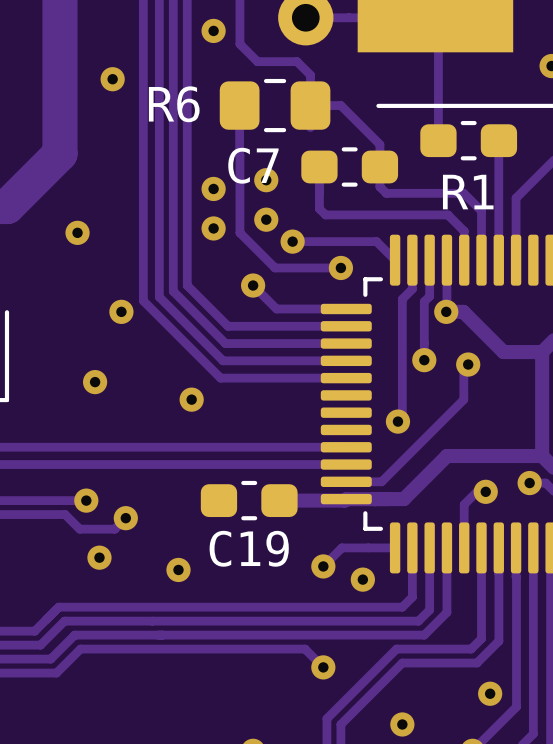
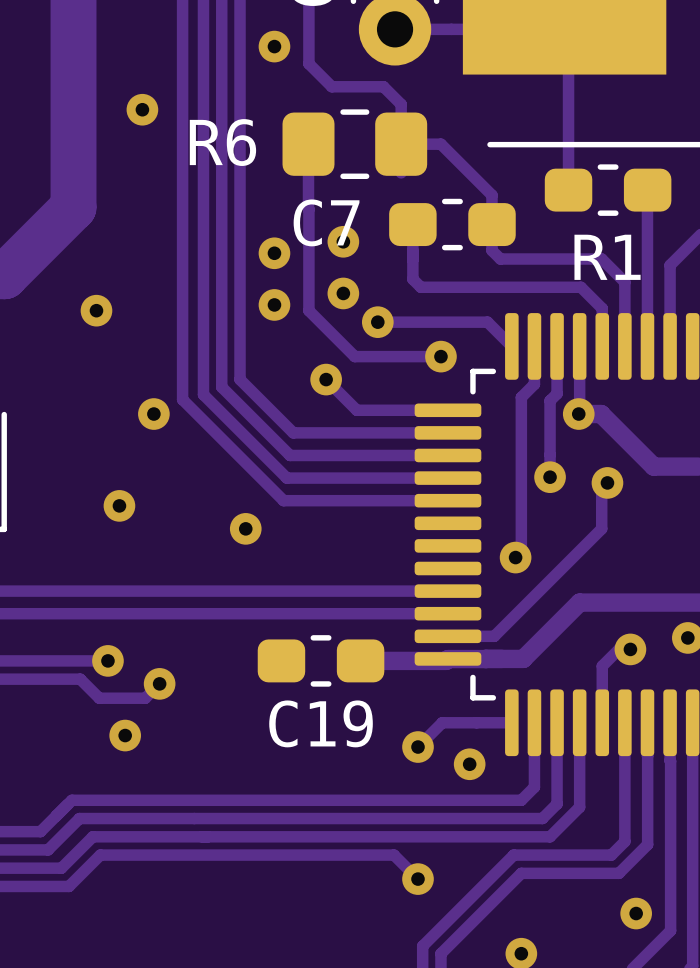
via: (178, 569) -> none

